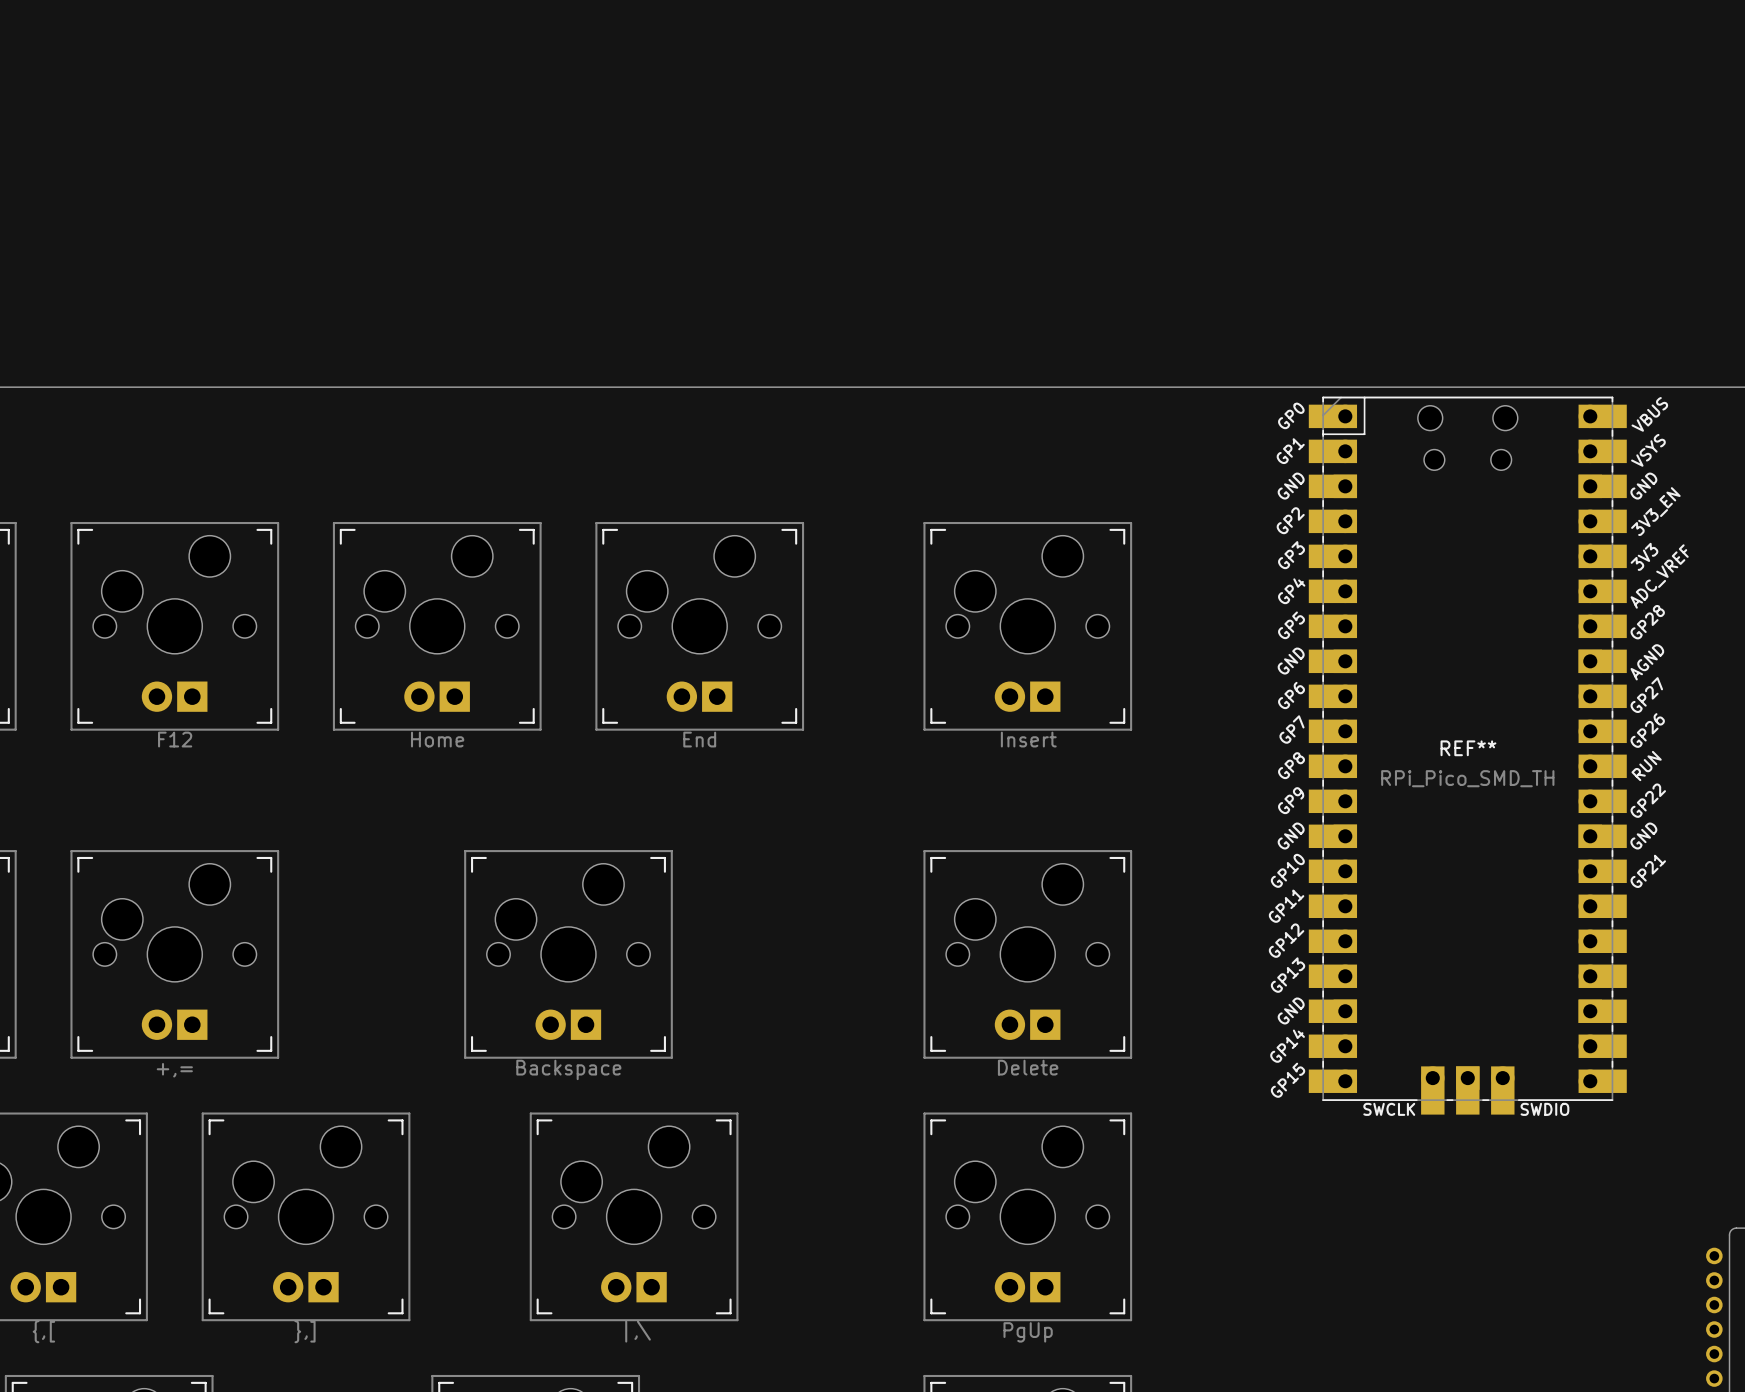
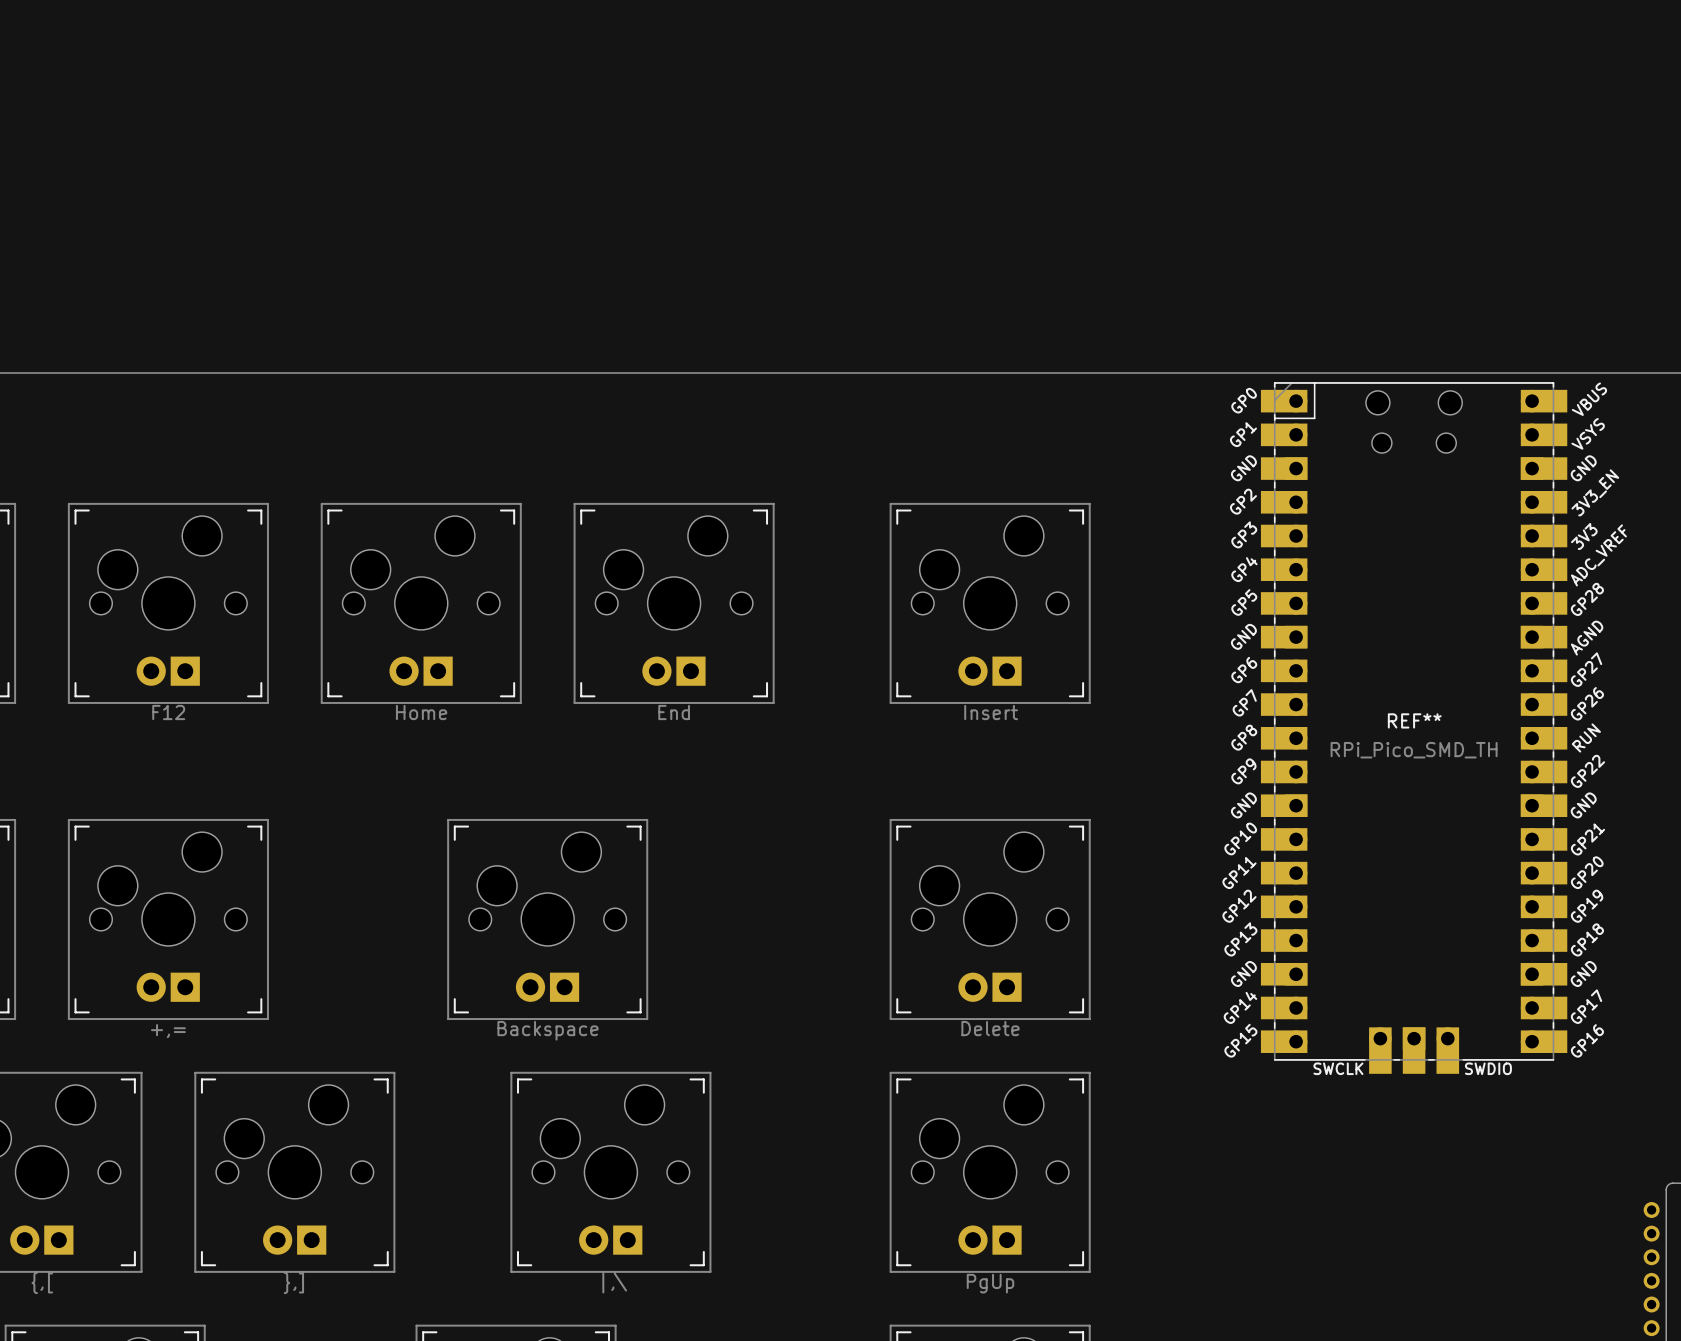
REF** text: none -> GP20 (1587, 872)
REF** text: none -> GP19 (1587, 906)
REF** text: none -> GP18 (1587, 939)
REF** text: none -> GND (1583, 973)
REF** text: none -> GP17 (1586, 1006)
REF** text: none -> GP16 (1587, 1040)

